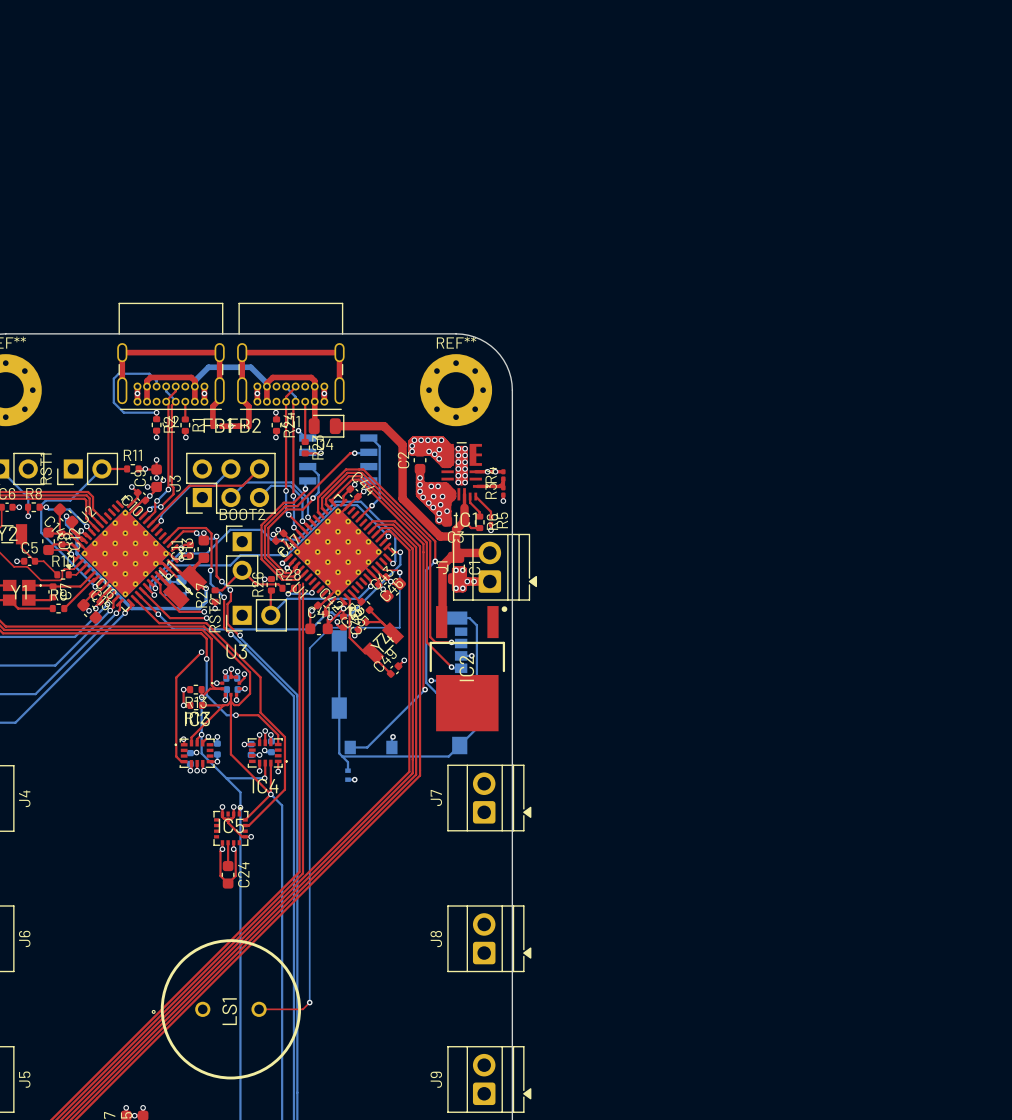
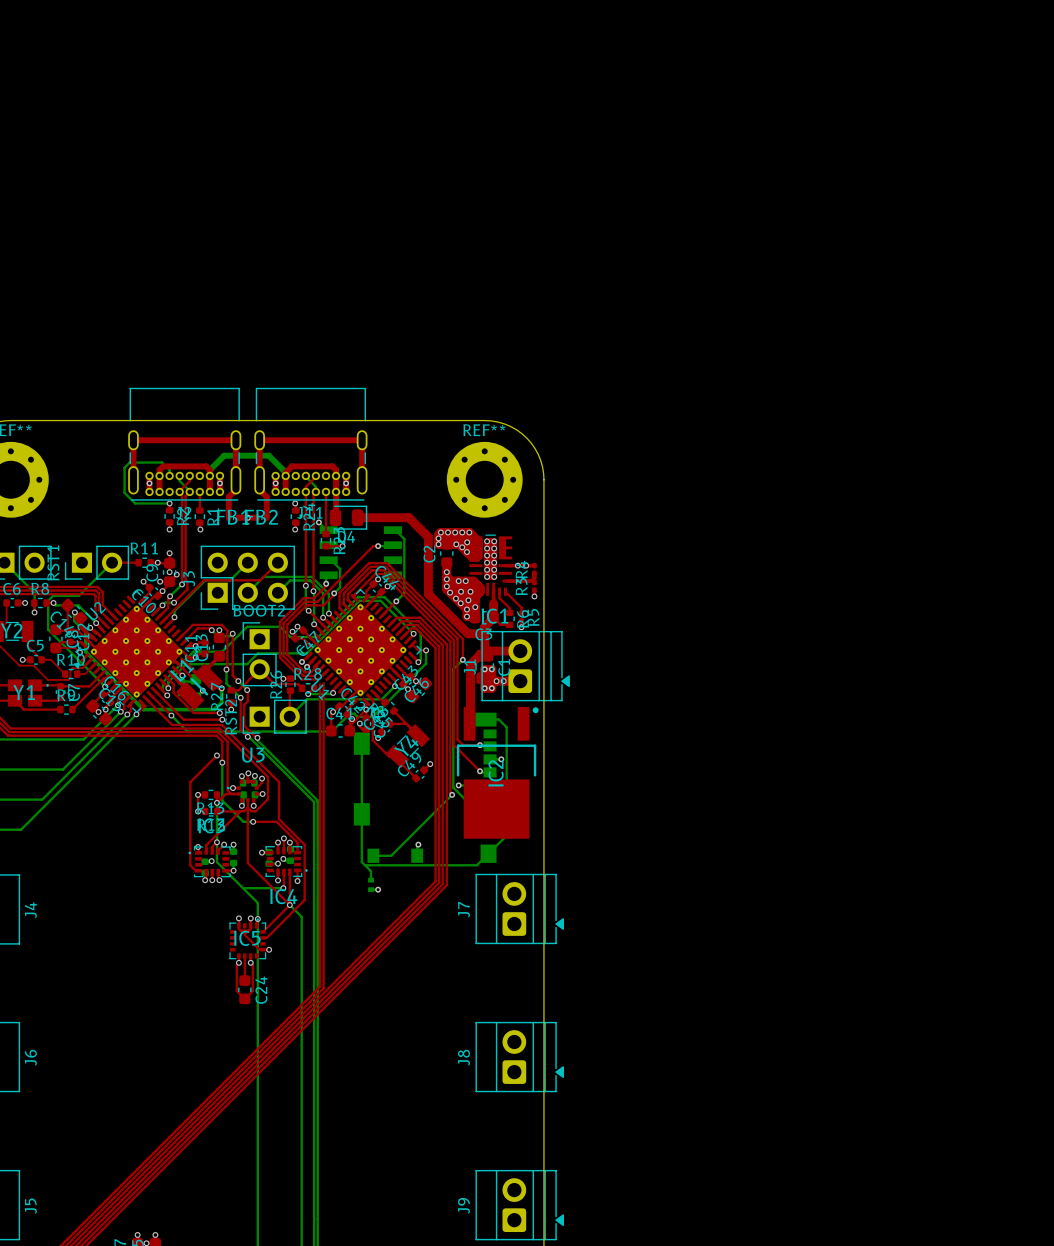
top track: (379, 565) (384, 570) (397, 570) (399, 572) -> none
bottom track: (399, 572) (399, 627) (330, 627) (309, 648) (309, 1002) -> none
via: (399, 572) -> none
top track: (309, 1002) (302, 1009) (259, 1009) -> none
via: (309, 1002) -> none
LS1: (226, 1009) -> none

